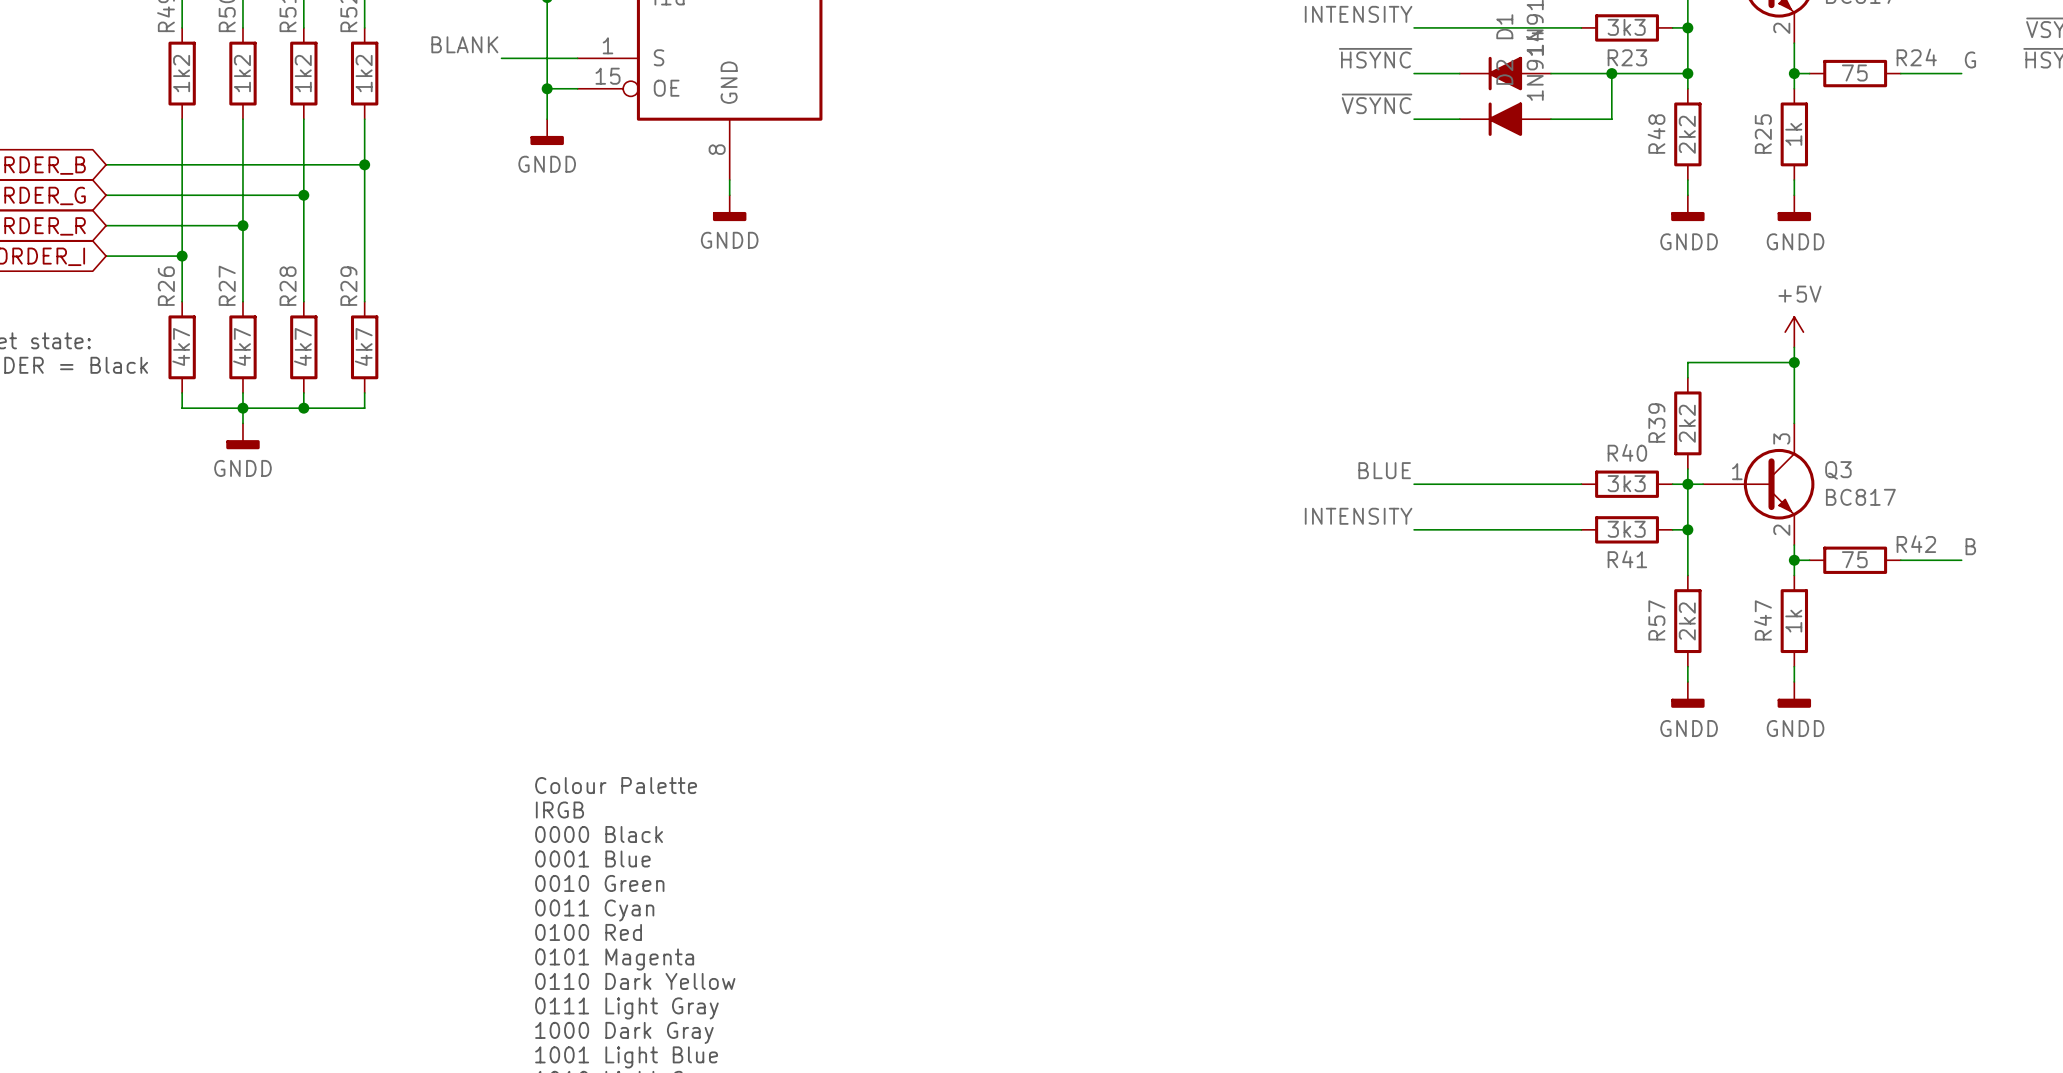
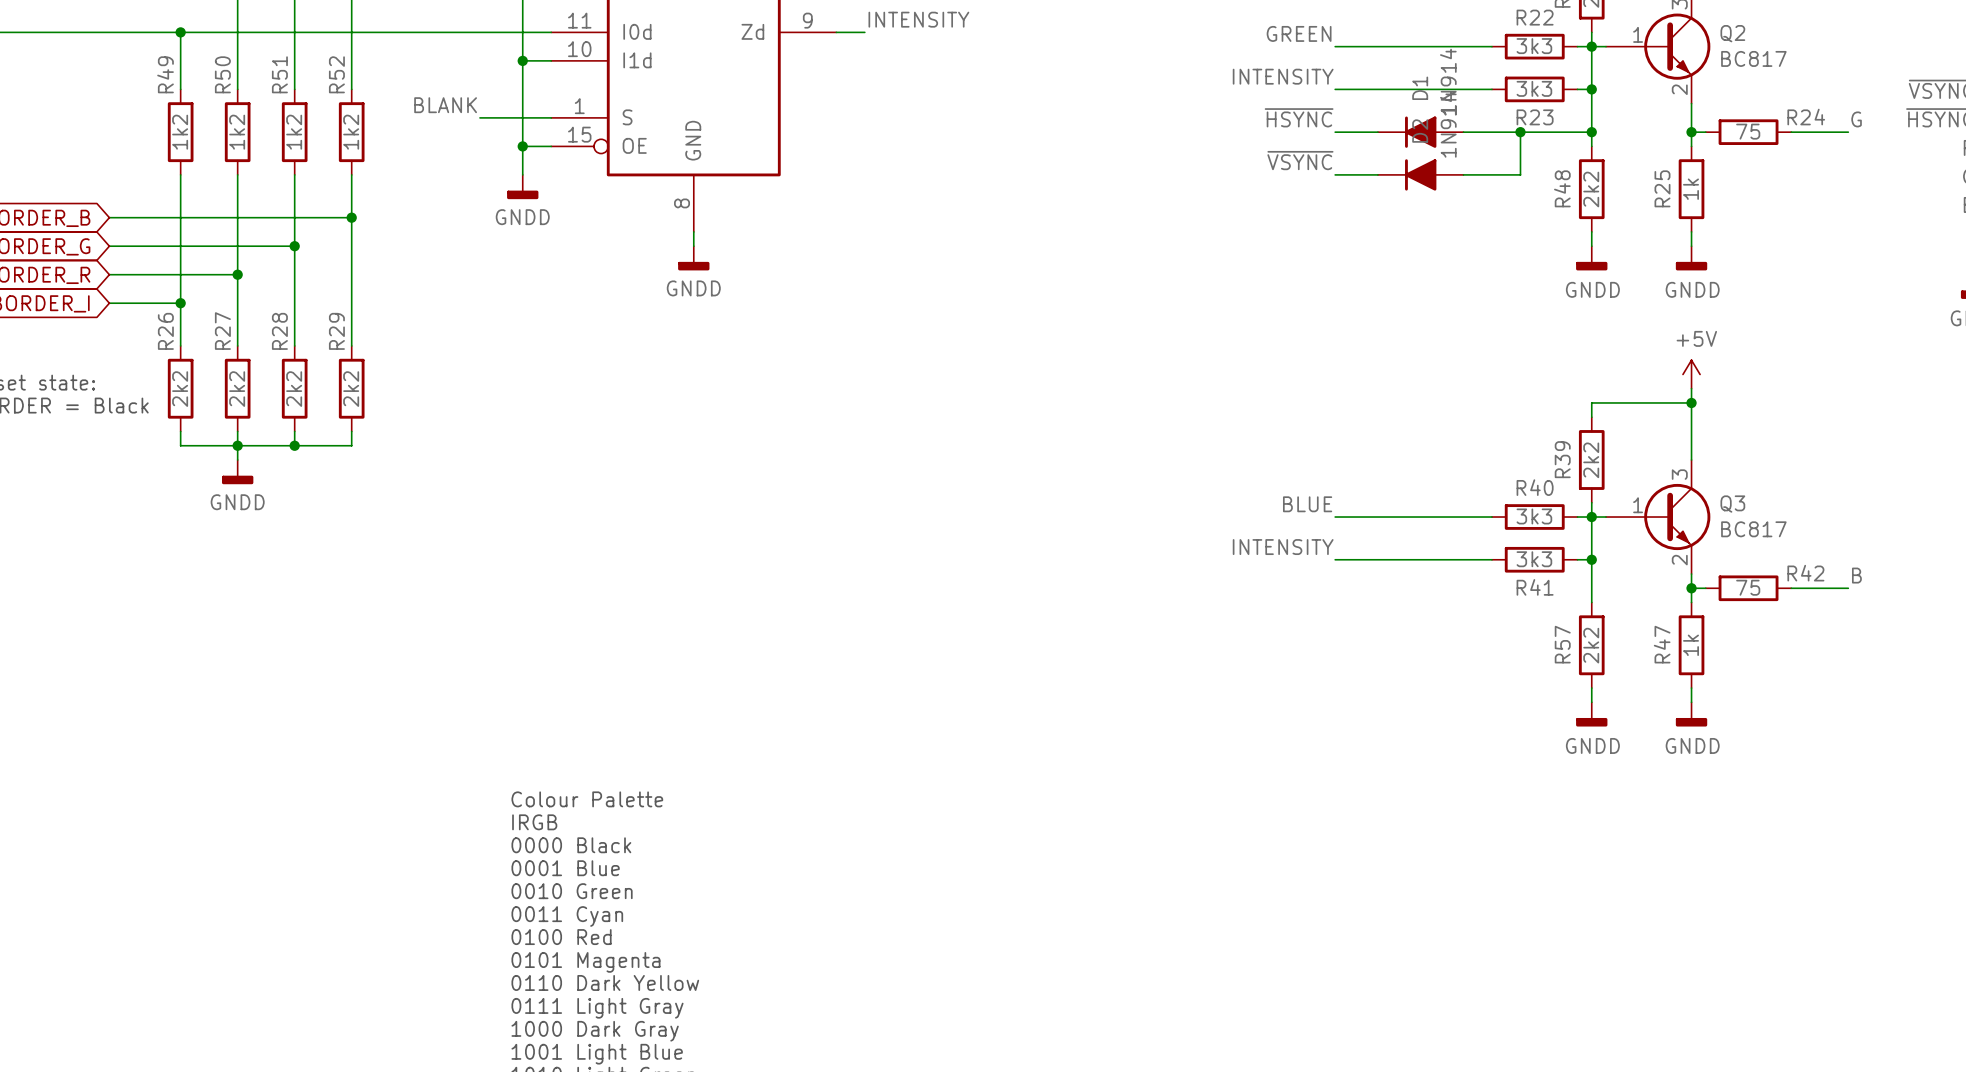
R26 value: 4k7 (181, 346) -> 2k2 (180, 389)
R27 value: 4k7 (242, 346) -> 2k2 (237, 389)
R28 value: 4k7 (302, 346) -> 2k2 (294, 389)
R29 value: 4k7 (363, 346) -> 2k2 (351, 389)

